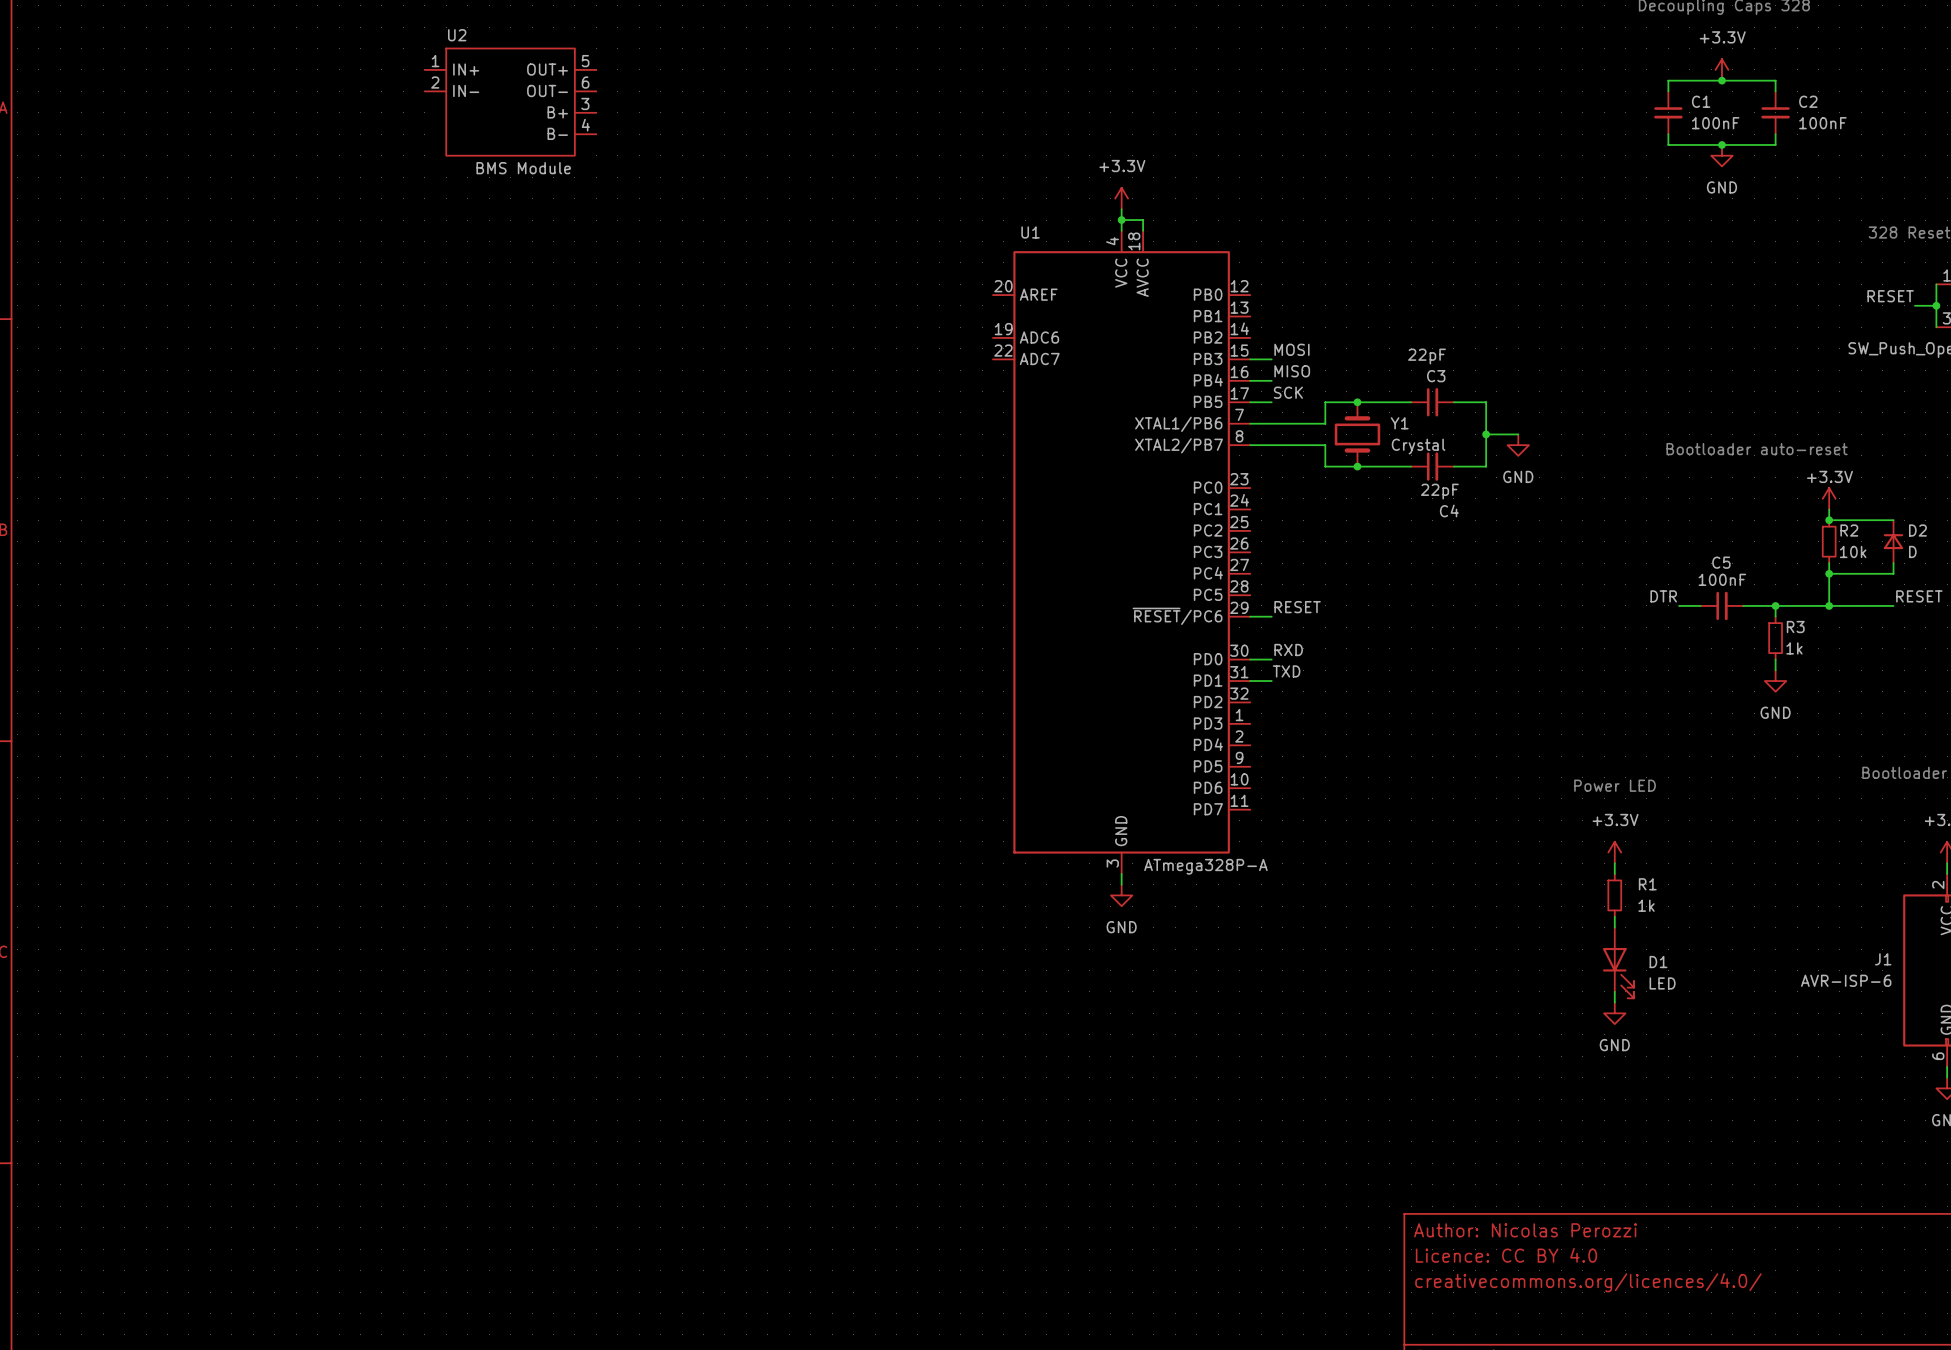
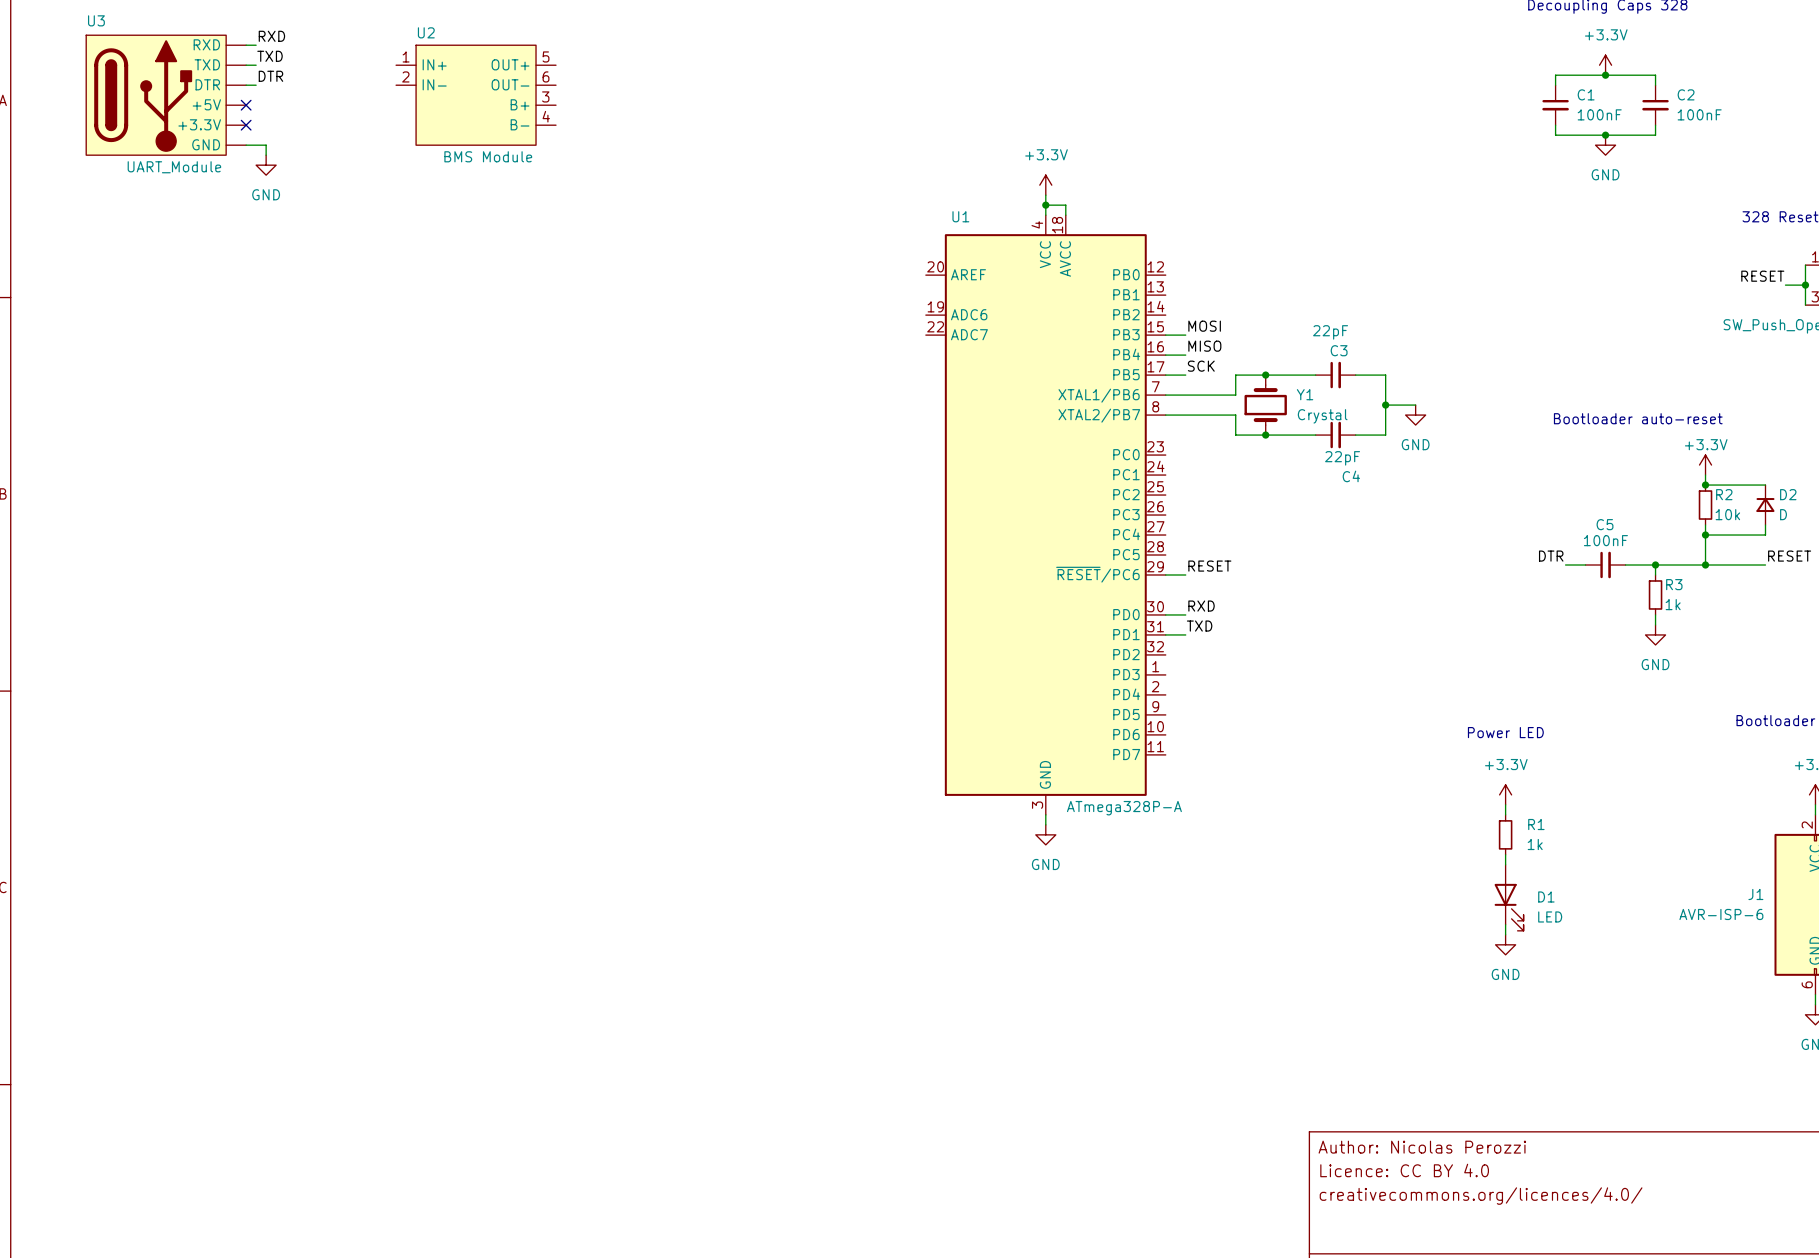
label: none -> RXD (271, 36)
wire: none -> (246, 45) (256, 45)
label: none -> TXD (270, 56)
wire: none -> (246, 65) (256, 65)
label: none -> DTR (270, 76)
wire: none -> (246, 85) (256, 85)
U3: none -> UART_Module (166, 95)
no-connect mark: none -> (246, 105)
no-connect mark: none -> (246, 125)
wire: none -> (246, 145) (266, 145) (266, 155)
power symbol: none -> GND (266, 165)

